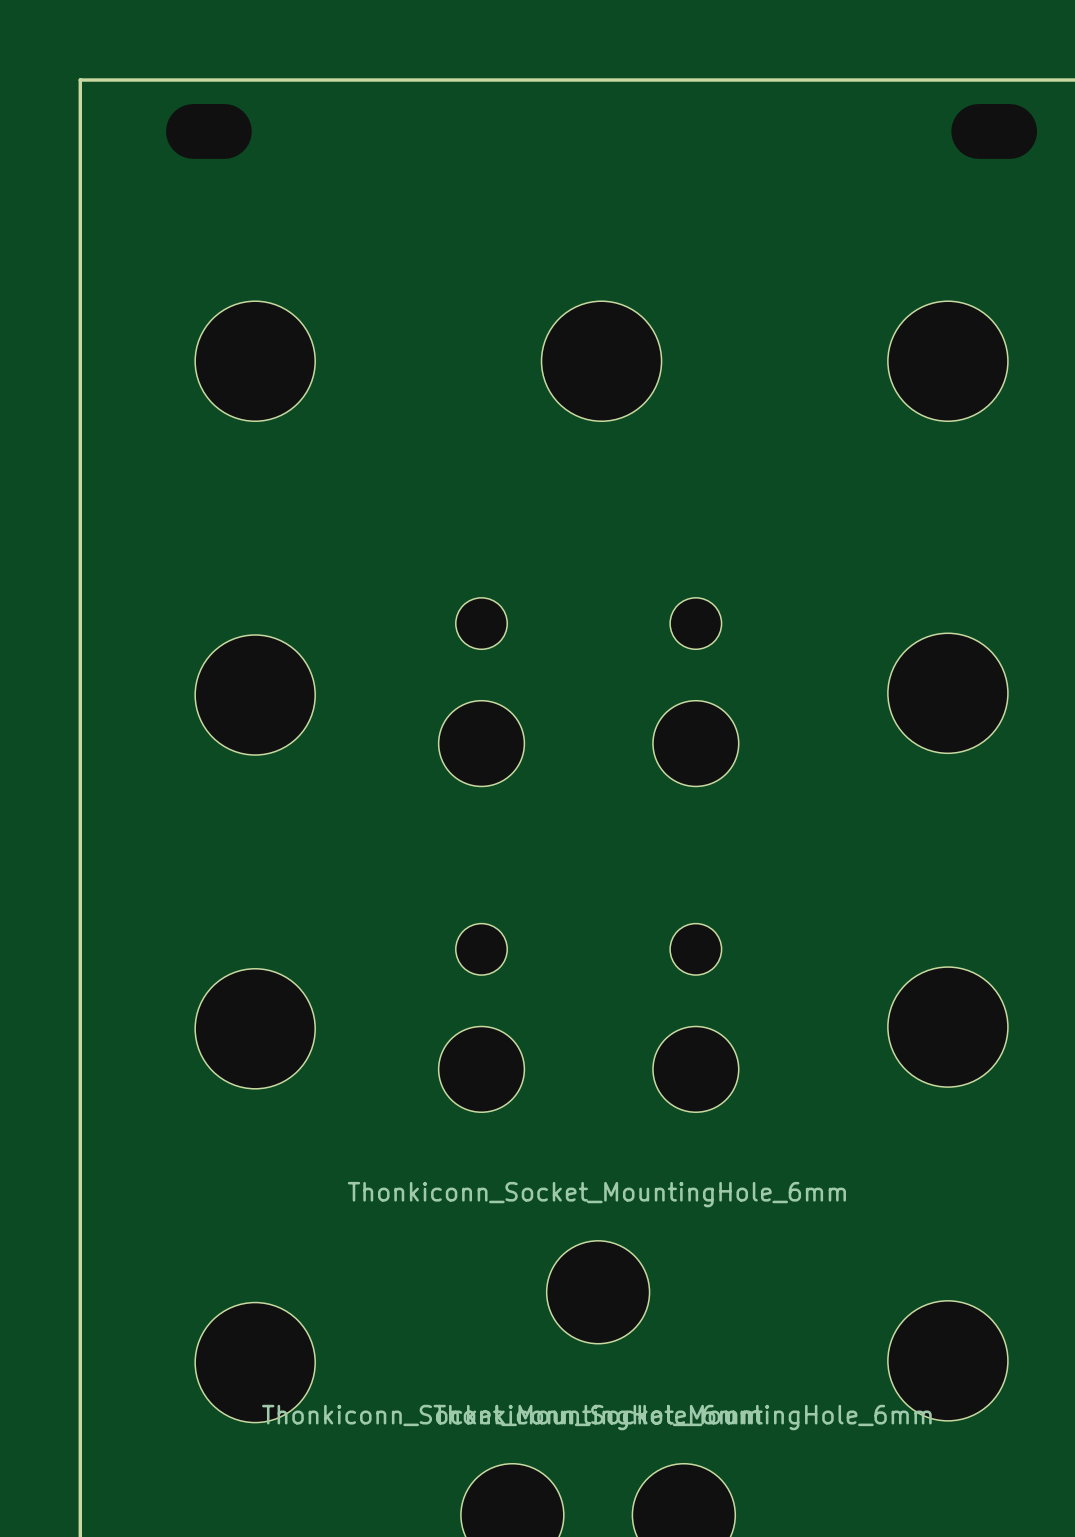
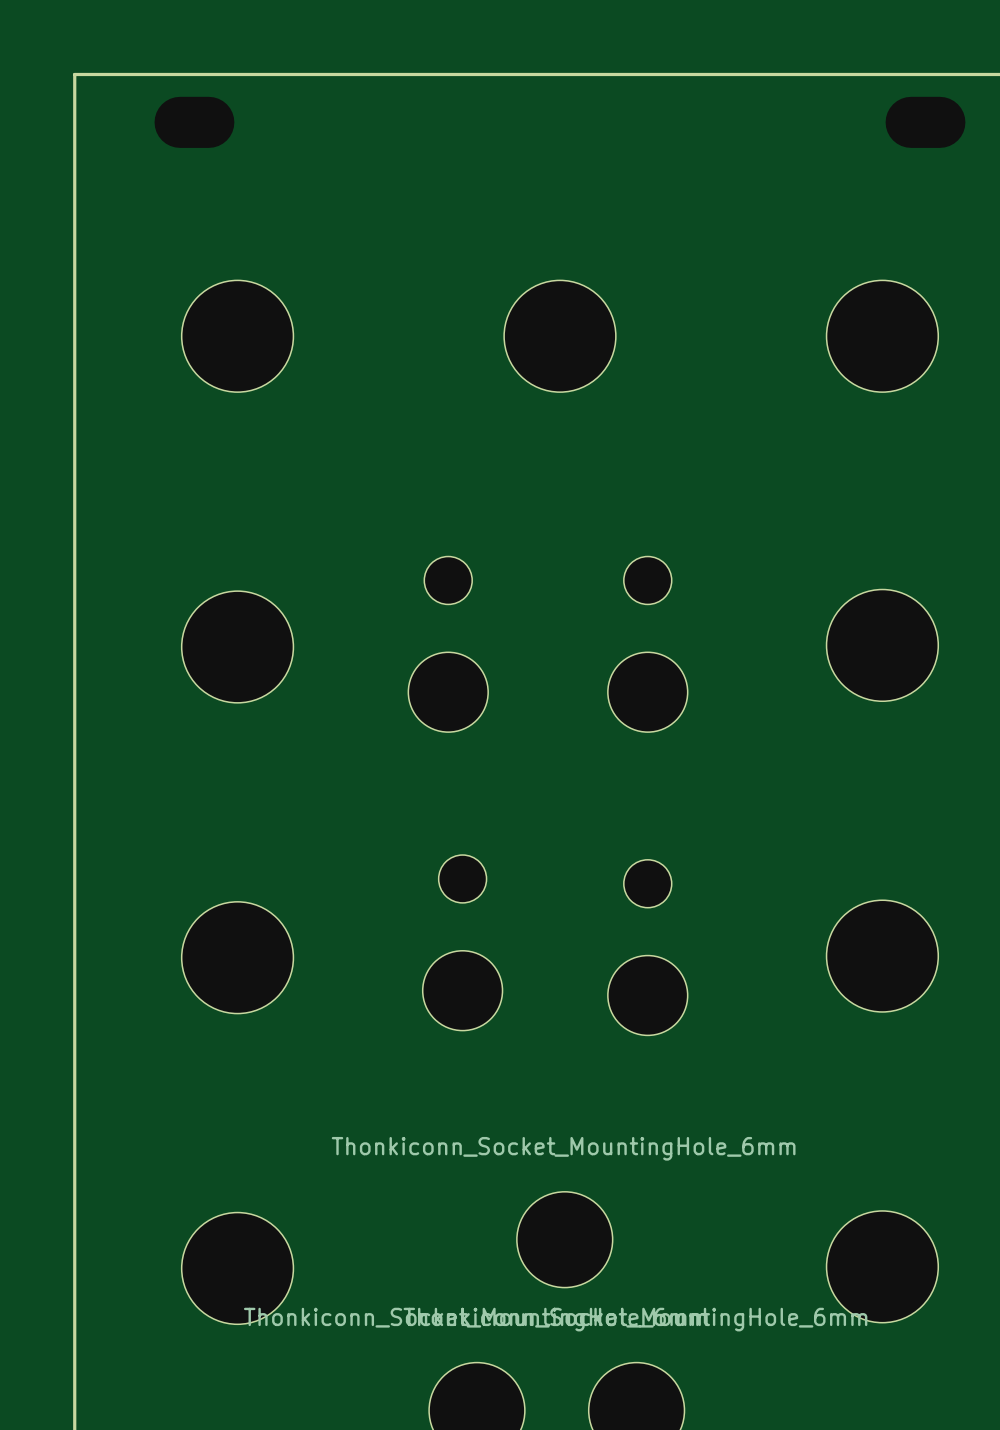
part position: (481, 949) -> (462, 878)
part position: (481, 1069) -> (462, 990)
part position: (598, 1292) -> (564, 1239)

